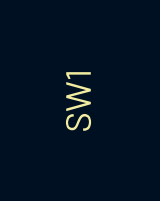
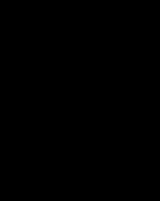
SW1: (78, 101) -> none

